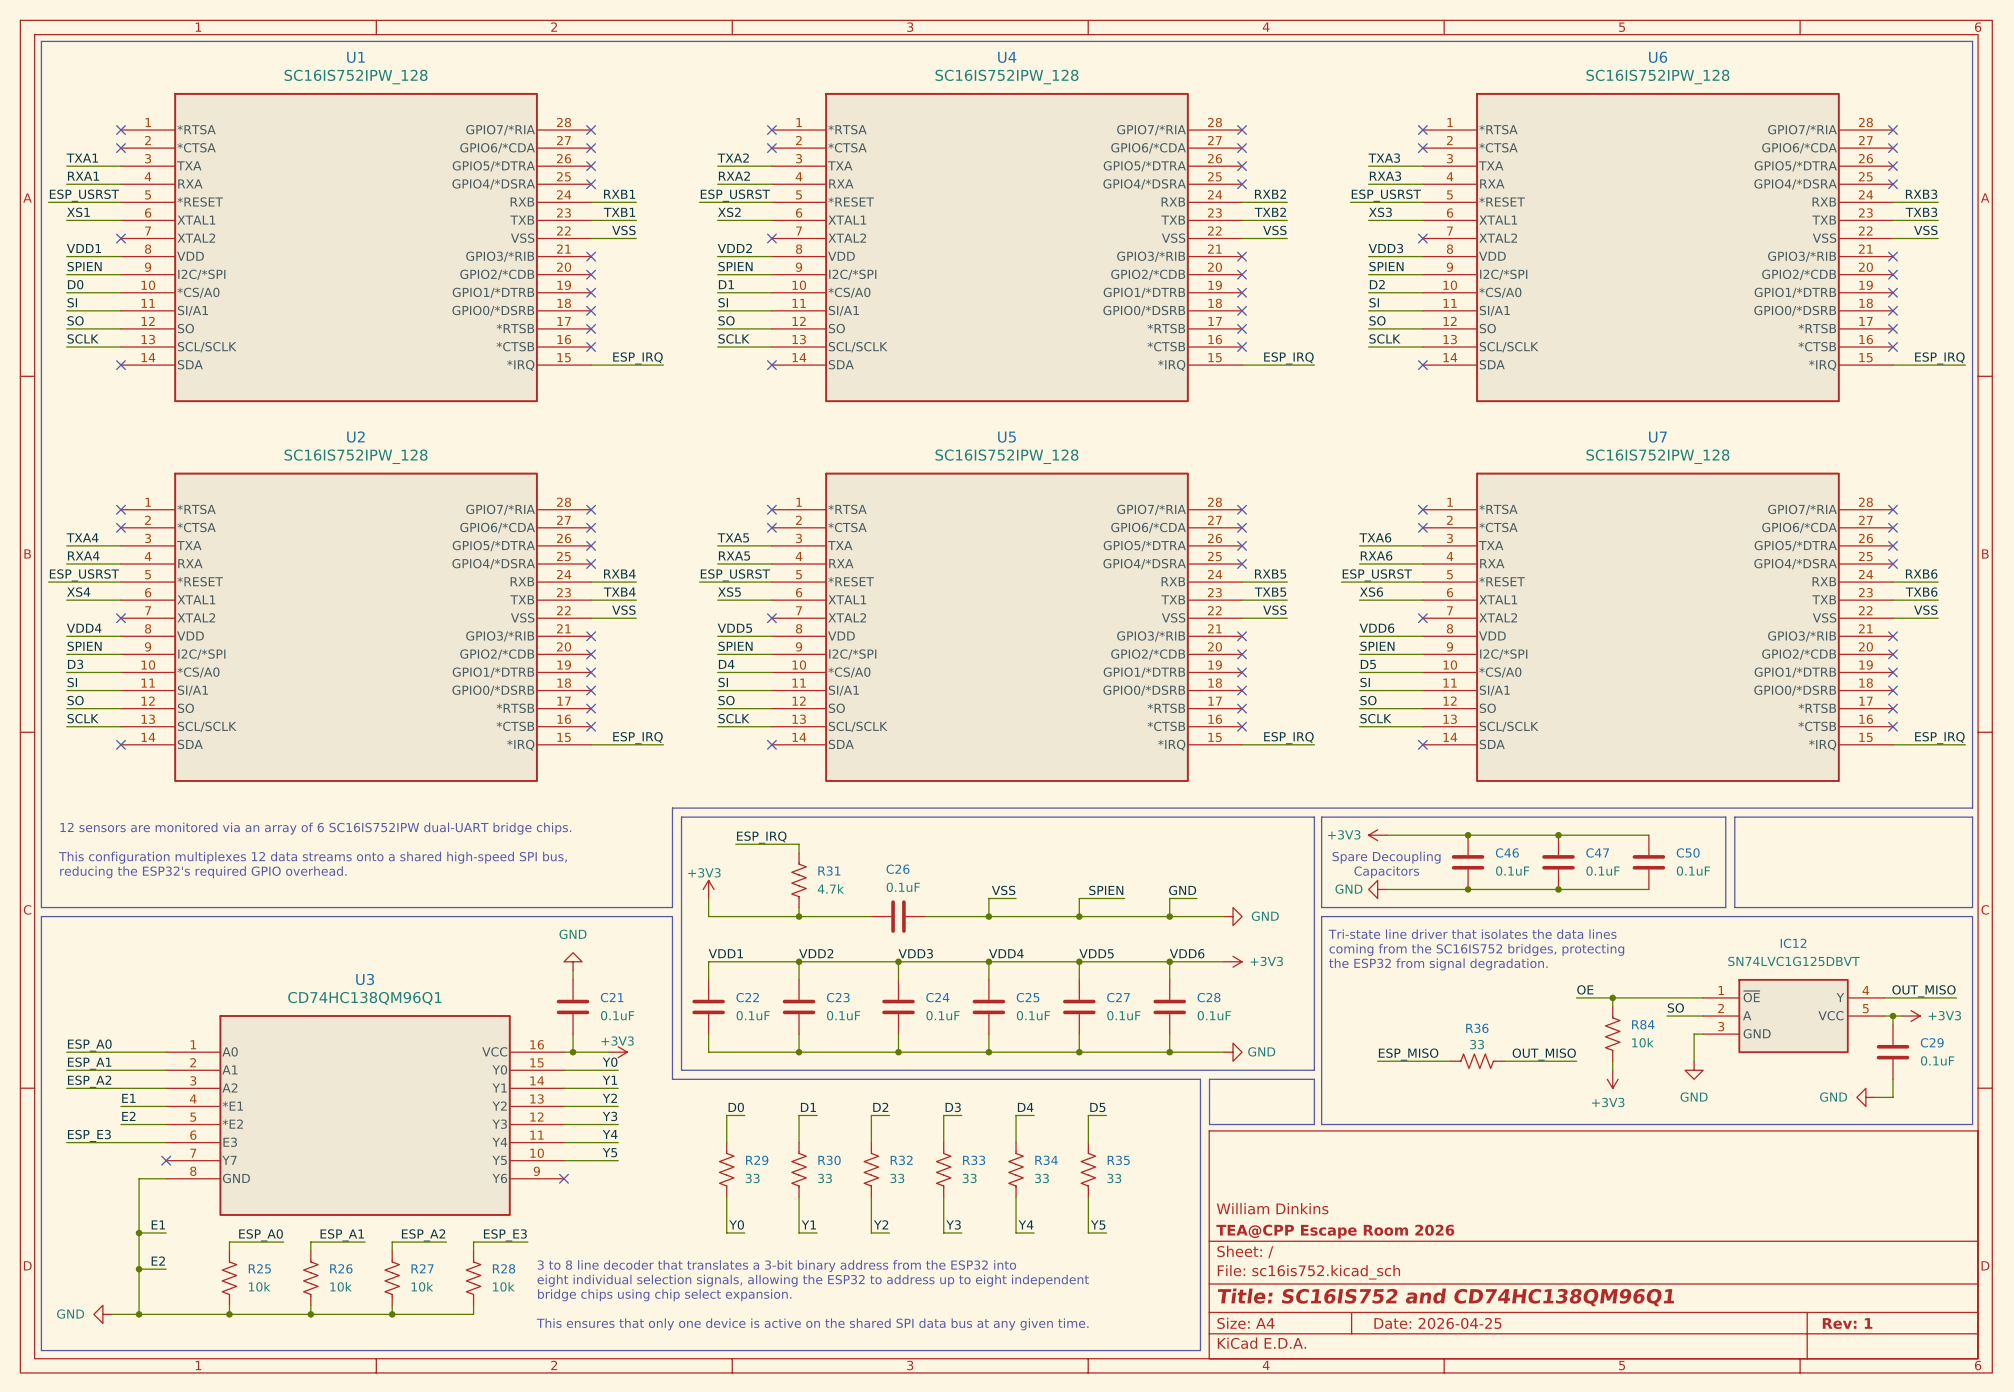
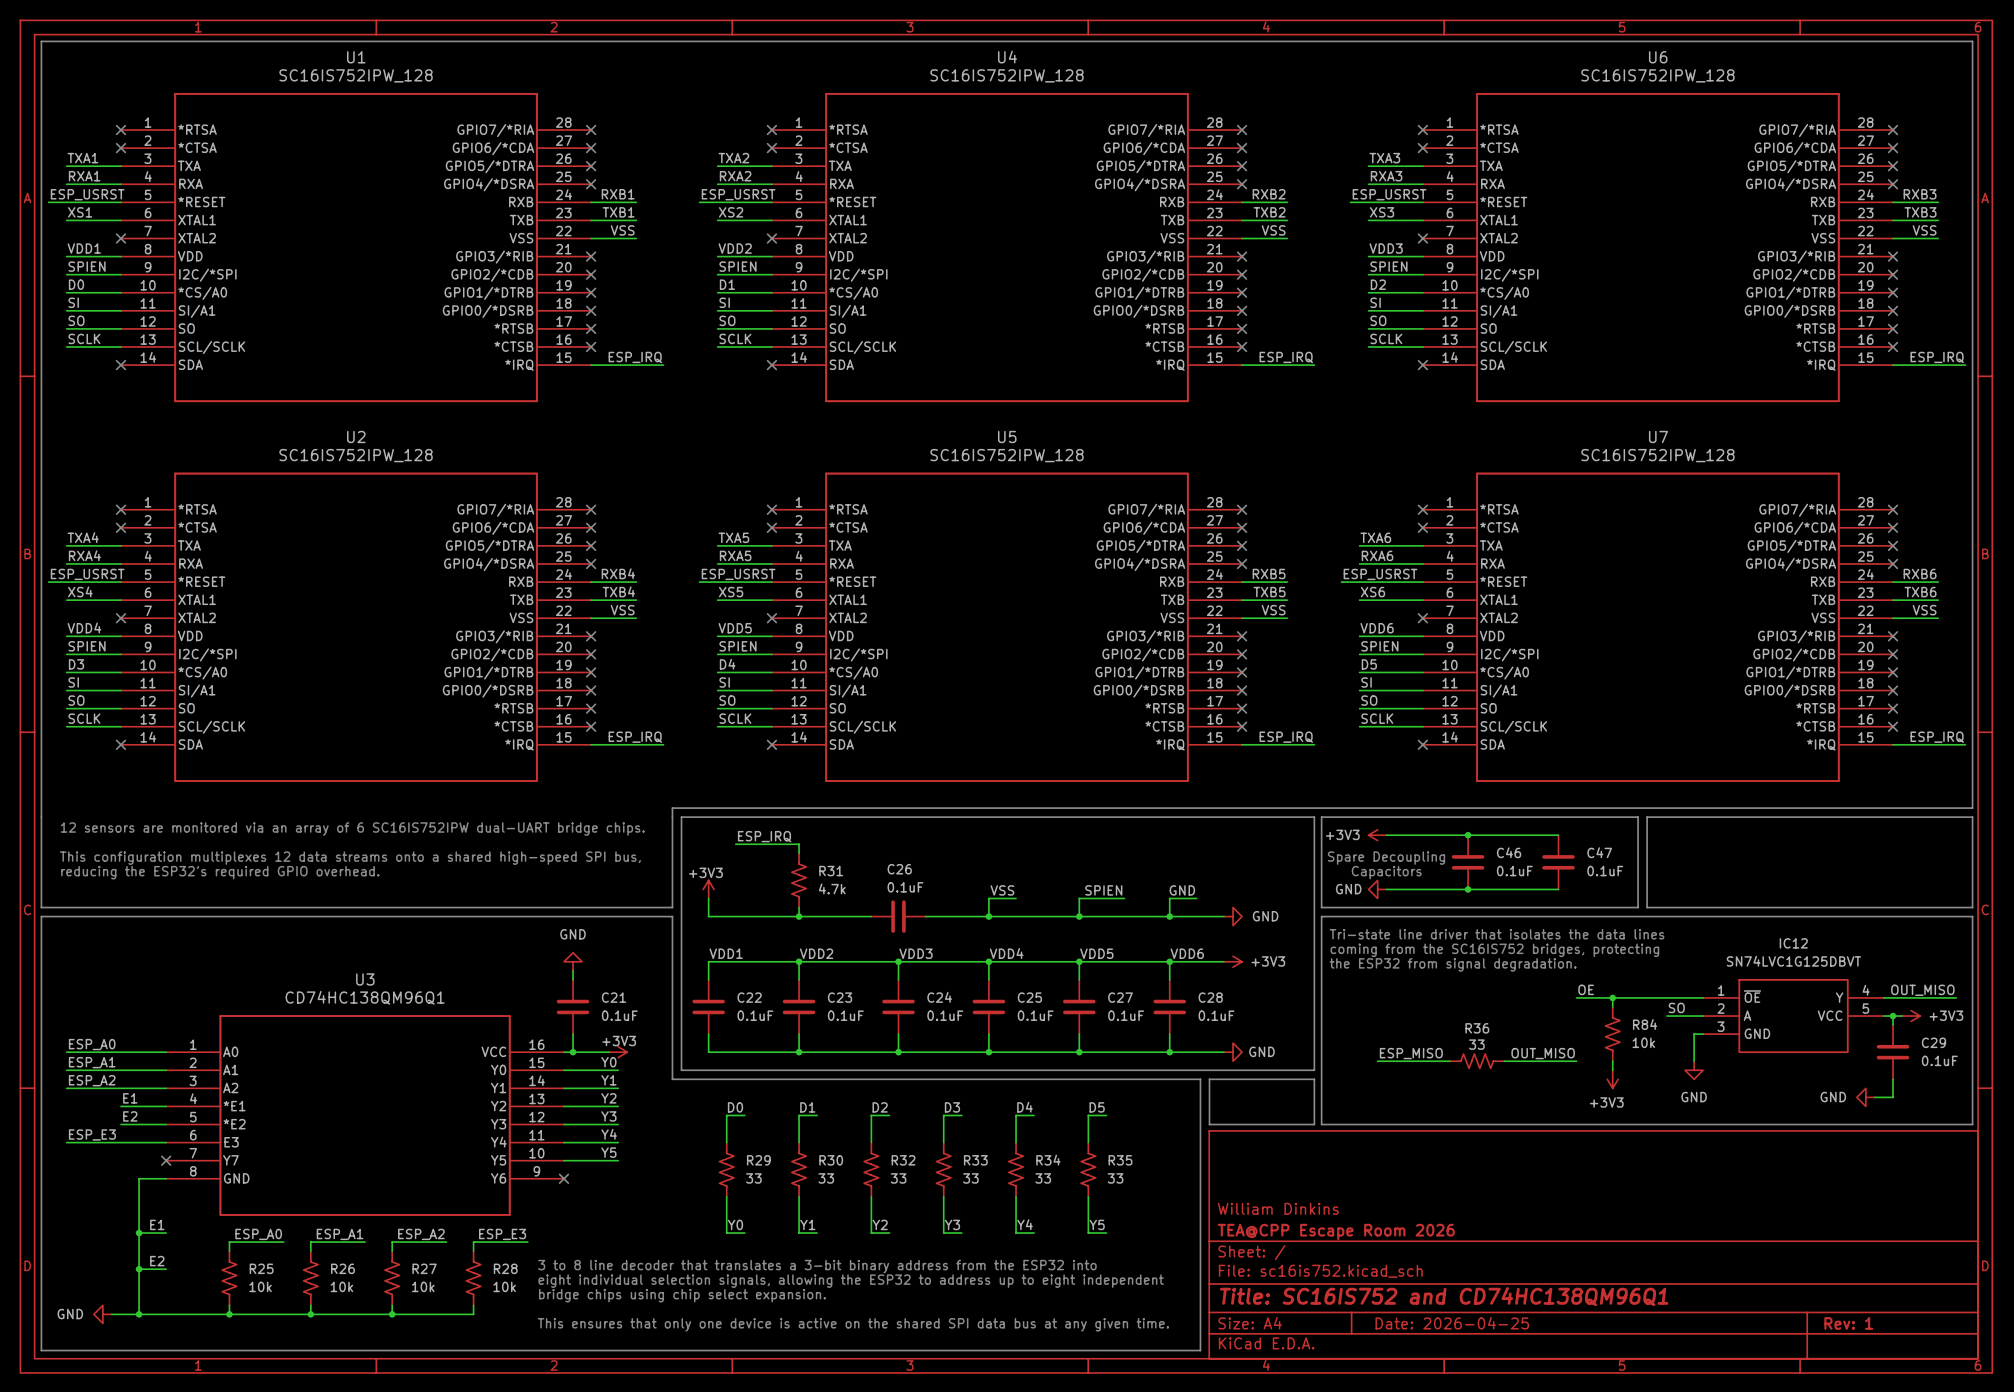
line: (1638, 817) (1647, 817) -> (1638, 817) (1638, 907)
line: (1725, 817) (1725, 907) -> (1725, 817) (1734, 817)
line: (1734, 817) (1734, 907) -> (1725, 907) (1734, 907)
wire: (1558, 835) (1648, 835) -> none
junction: (1558, 835) -> none
C50: 0.1uF (1648, 862) -> none
wire: (1558, 889) (1648, 889) -> none
junction: (1558, 889) -> none
line: (1638, 907) (1647, 907) -> (1647, 817) (1647, 907)

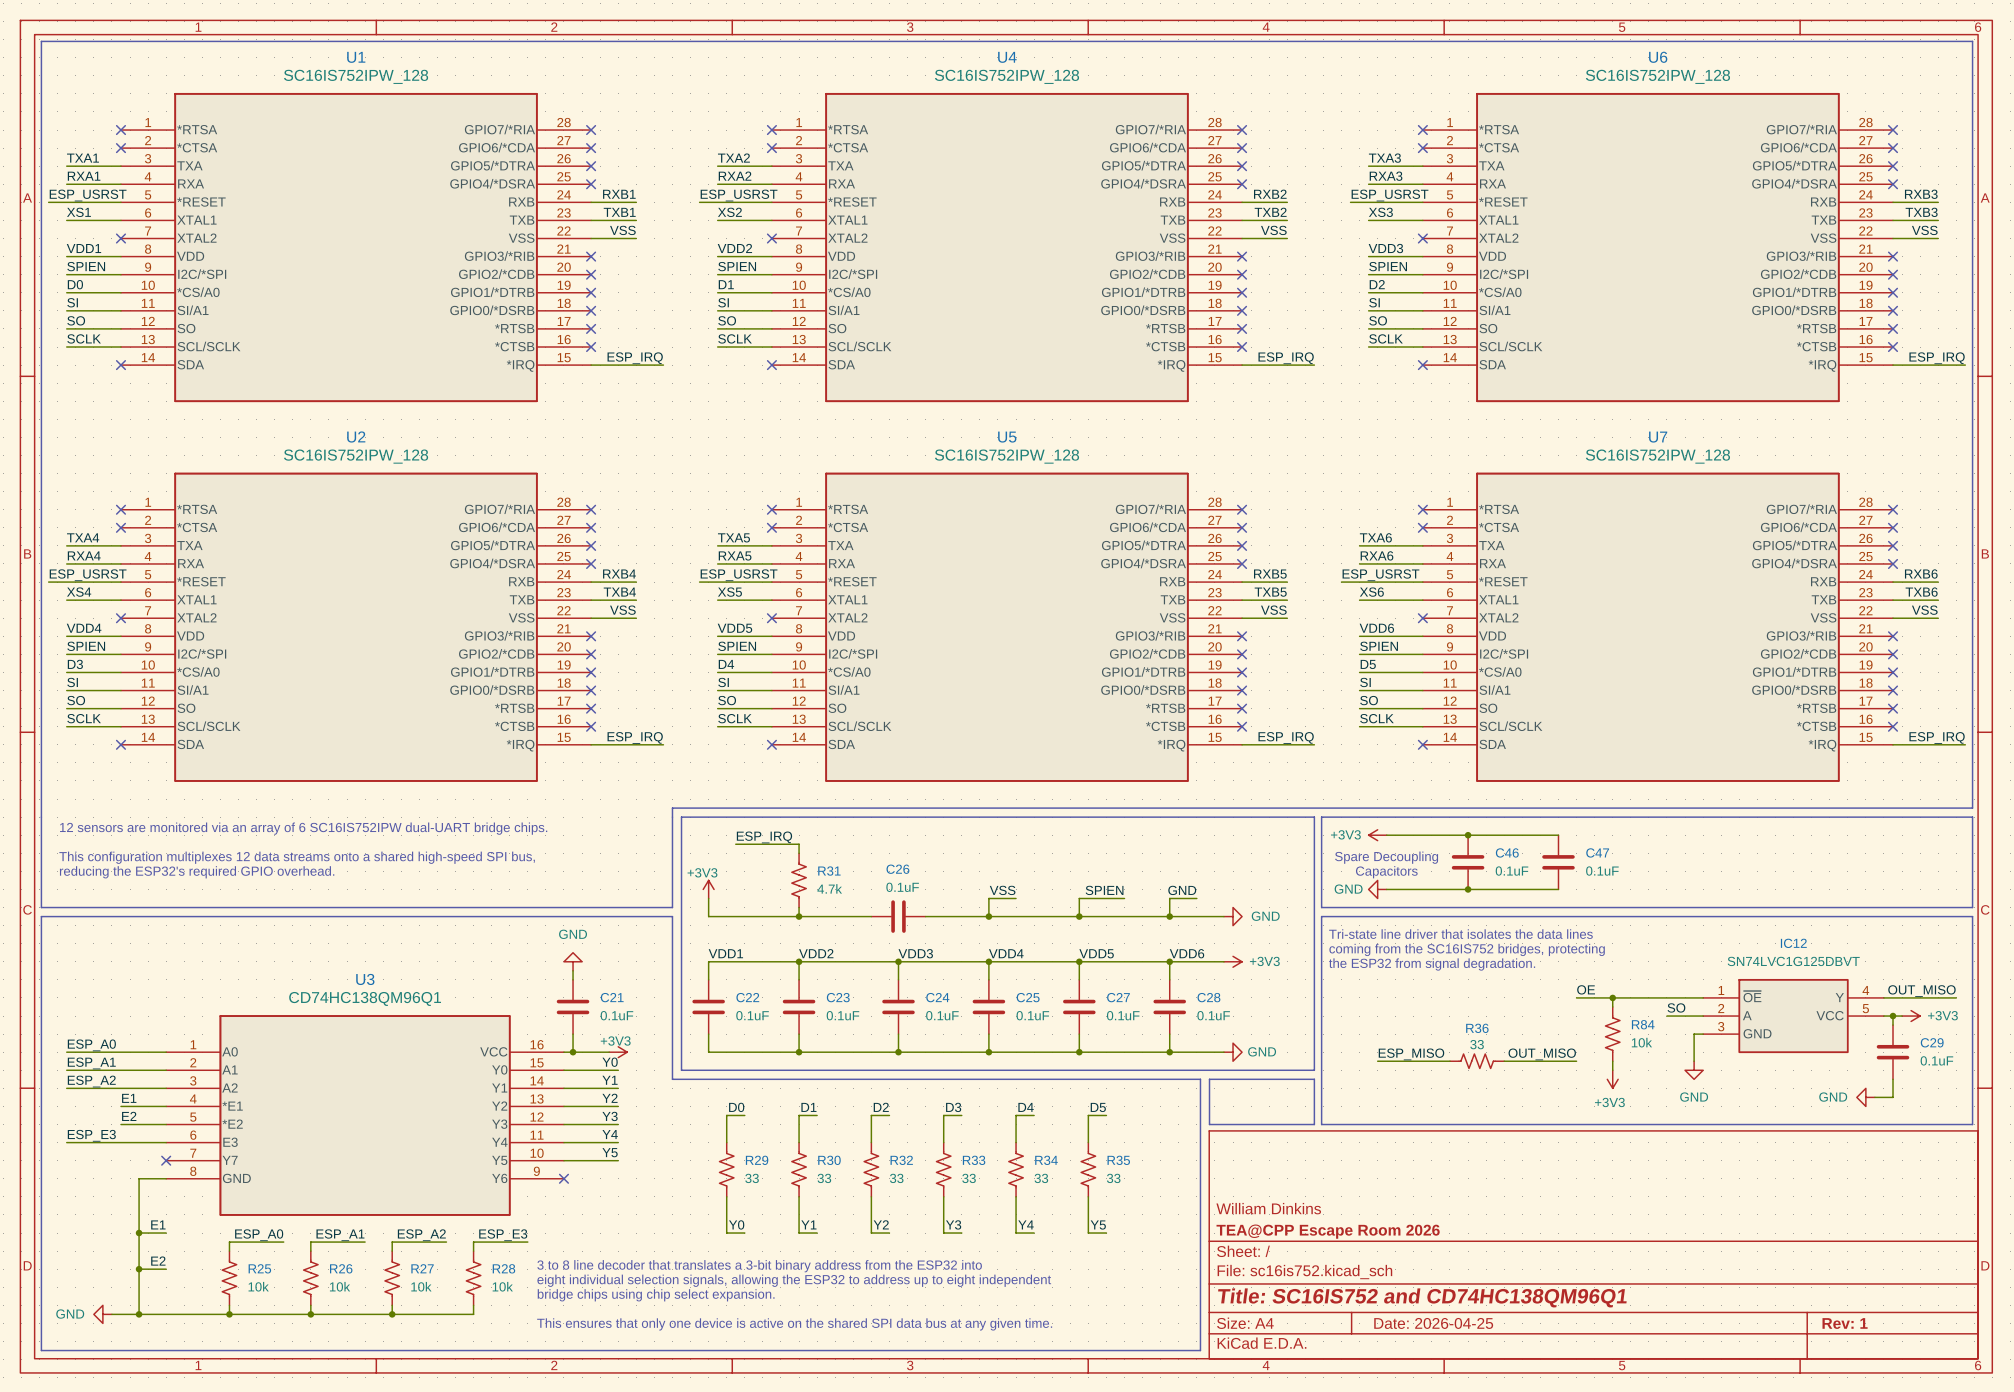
line: (1638, 817) (1638, 907) -> (1638, 817) (1647, 817)
line: (1647, 817) (1647, 907) -> (1638, 907) (1647, 907)

